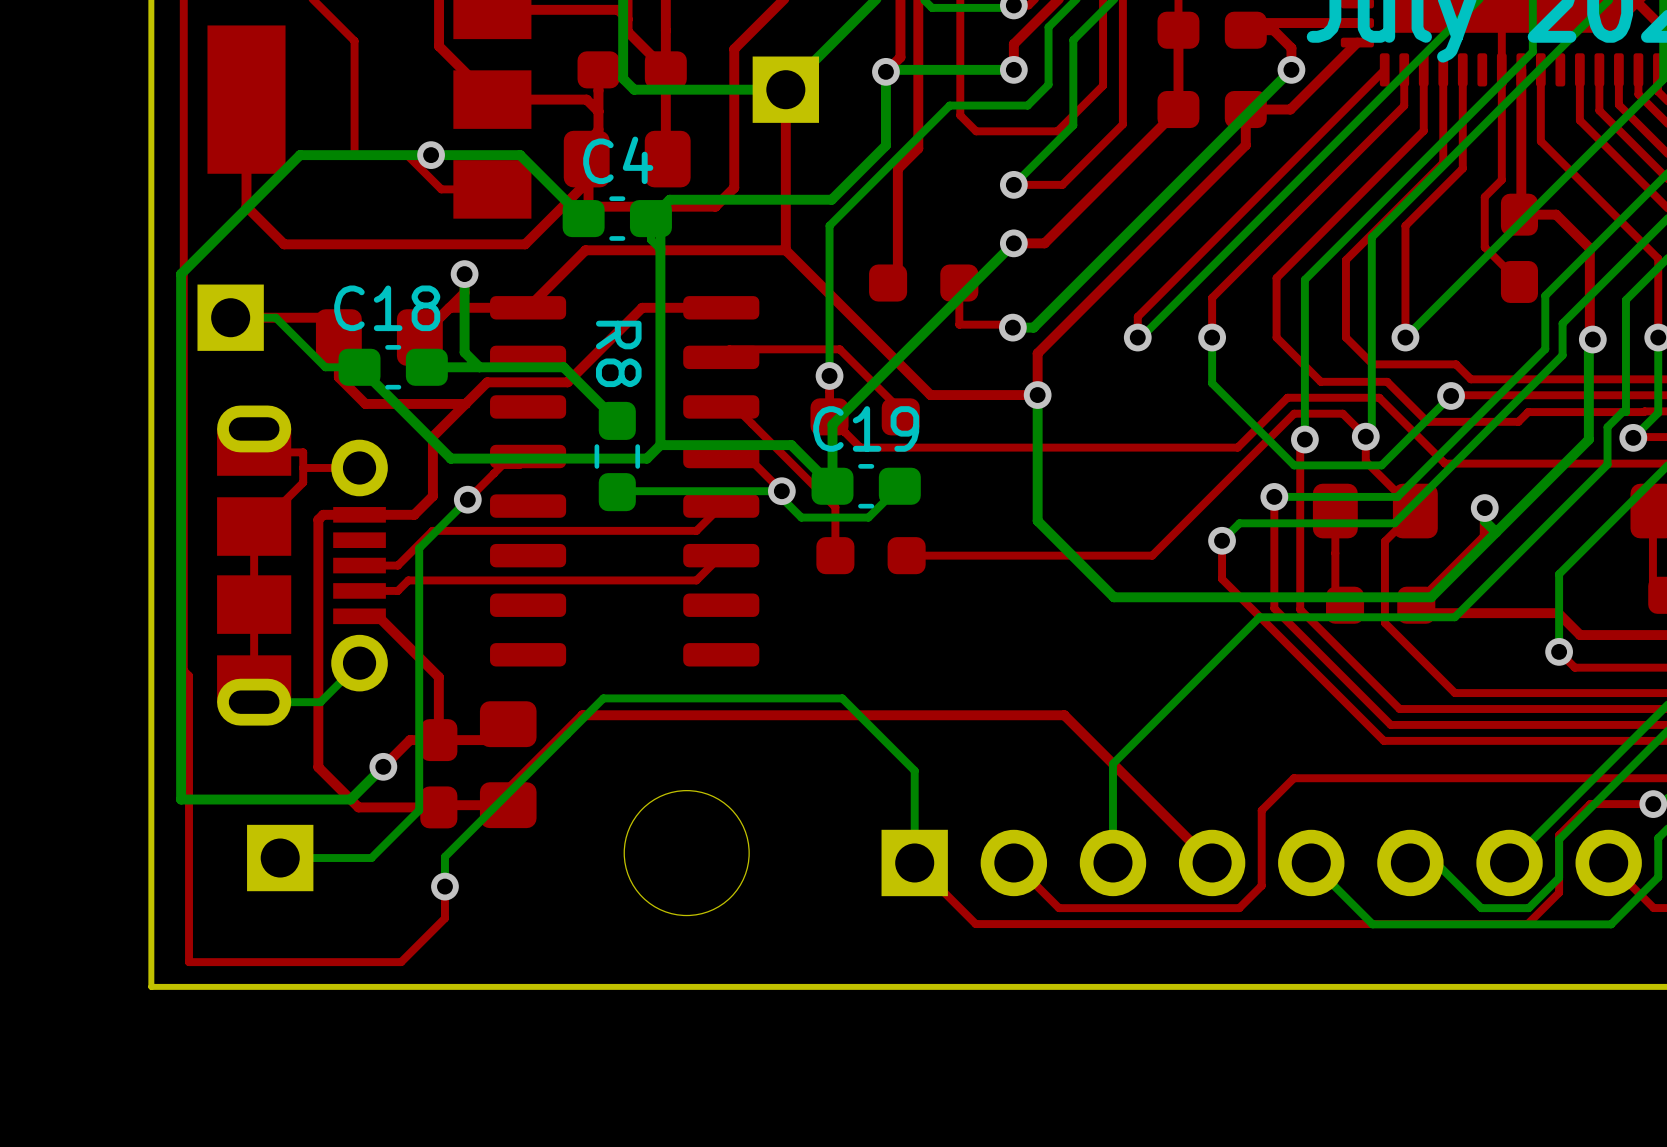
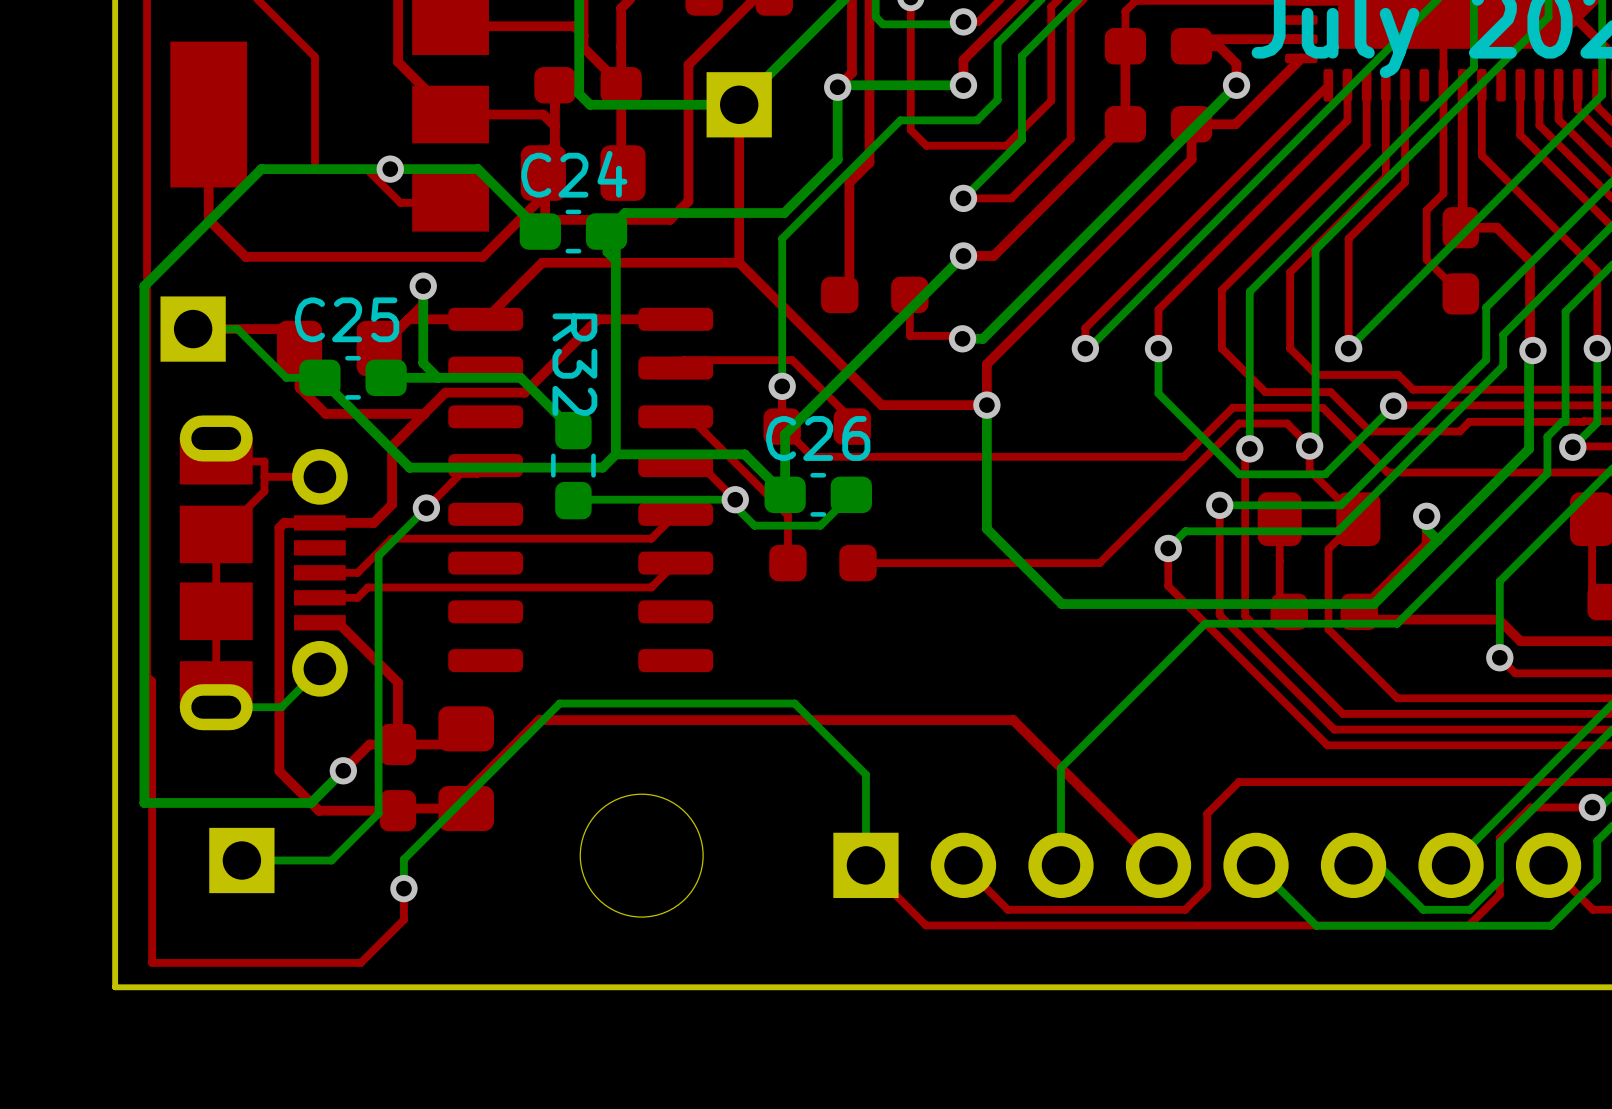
C4 name: C4 (618, 160) -> C24 (574, 174)
C18 name: C18 (387, 308) -> C25 (347, 319)
R8 name: R8 (618, 353) -> R32 (574, 364)
C19 name: C19 (866, 428) -> C26 (818, 438)

